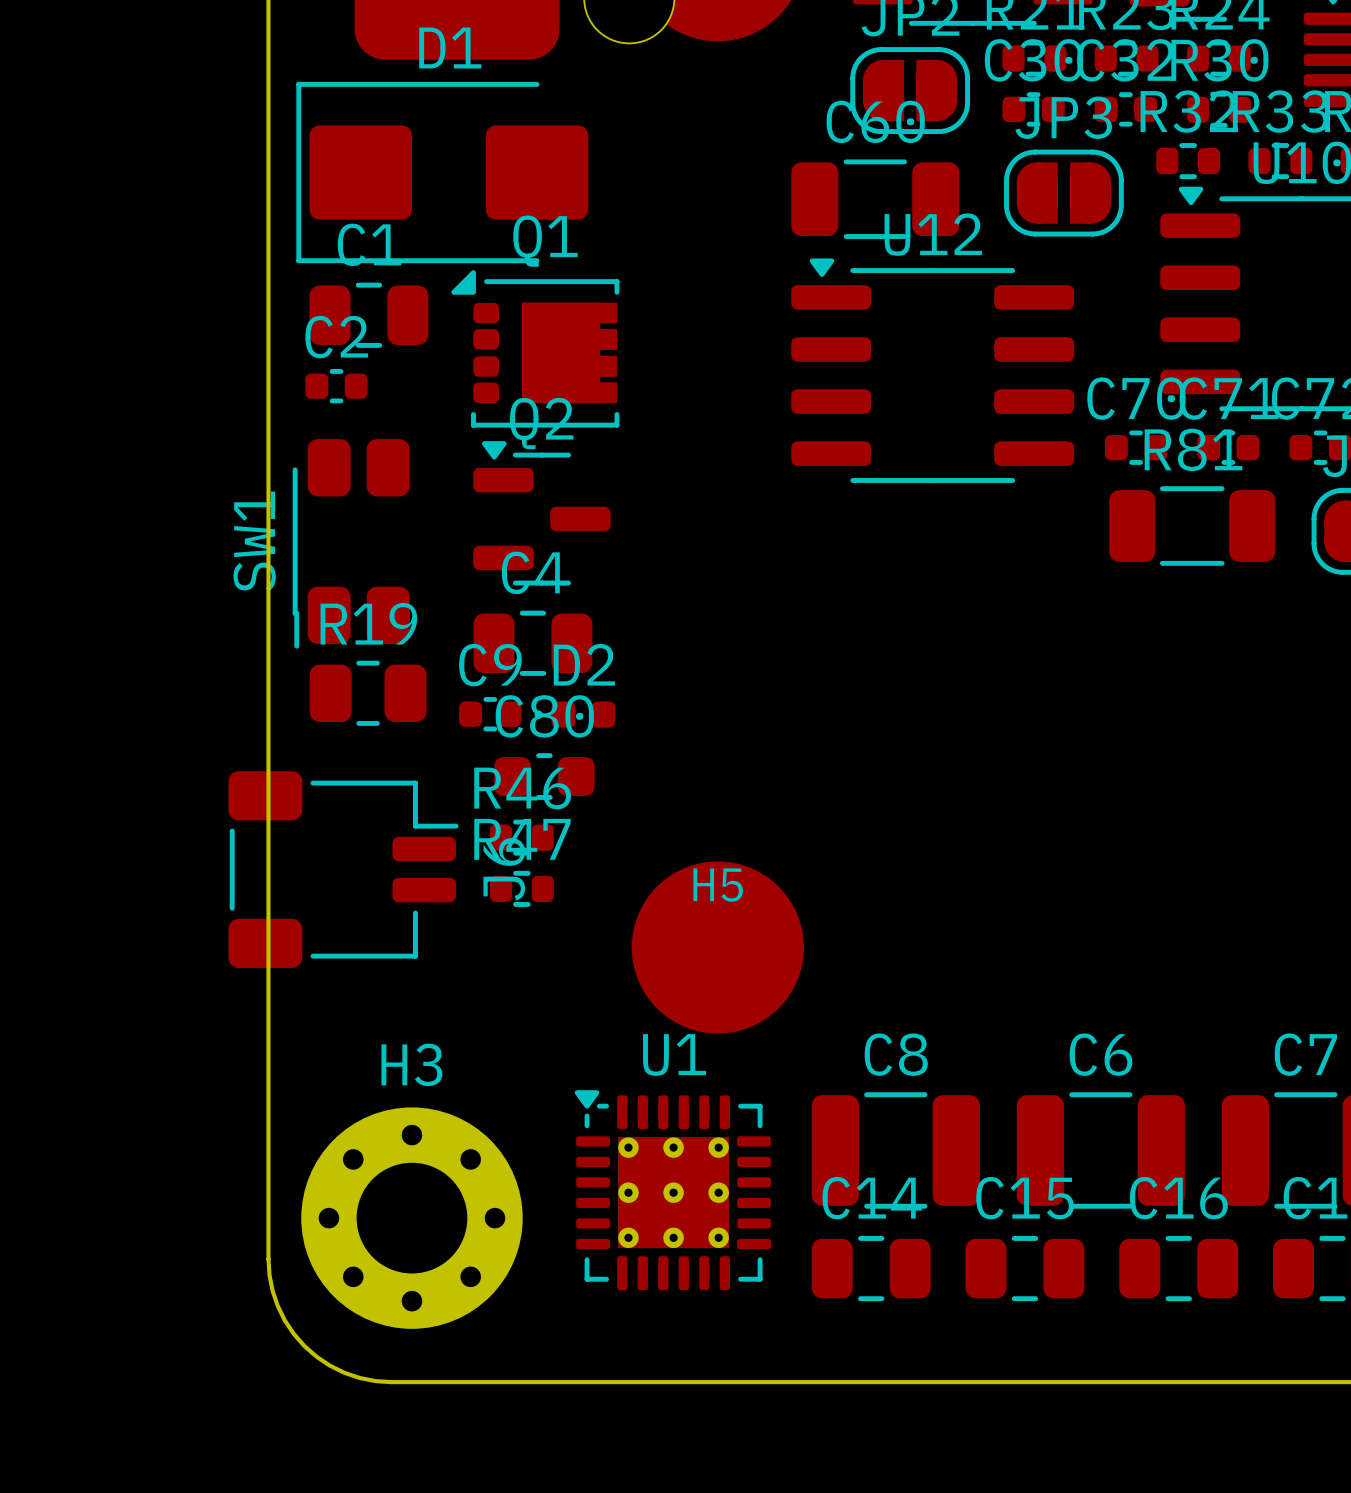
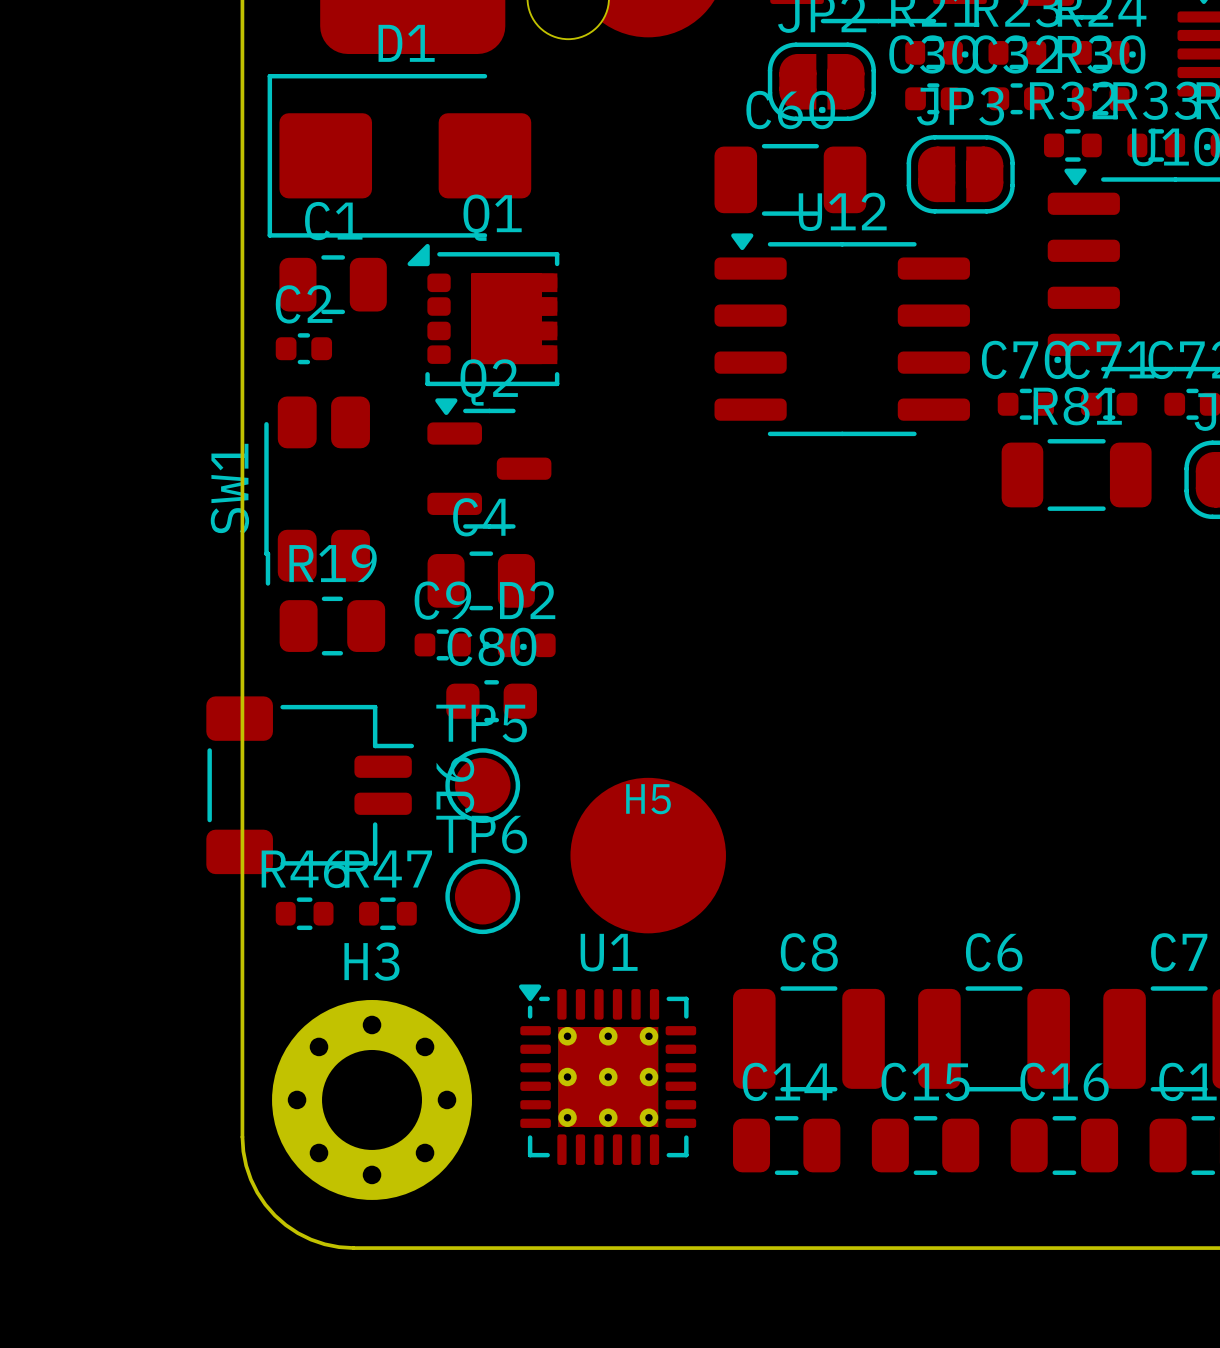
R46 position: (521, 837) -> (304, 913)
TP5: none -> (482, 785)
R47 position: (521, 888) -> (387, 913)
TP6: none -> (482, 896)

